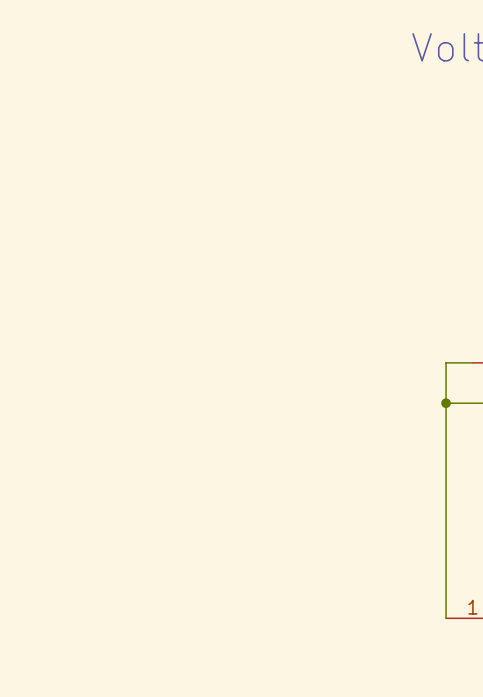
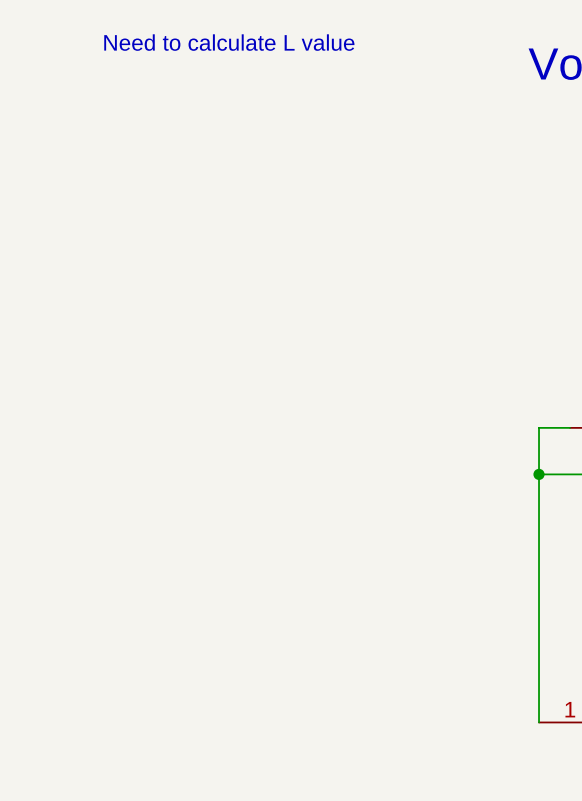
text: none -> Need to calculate L value (229, 42)

